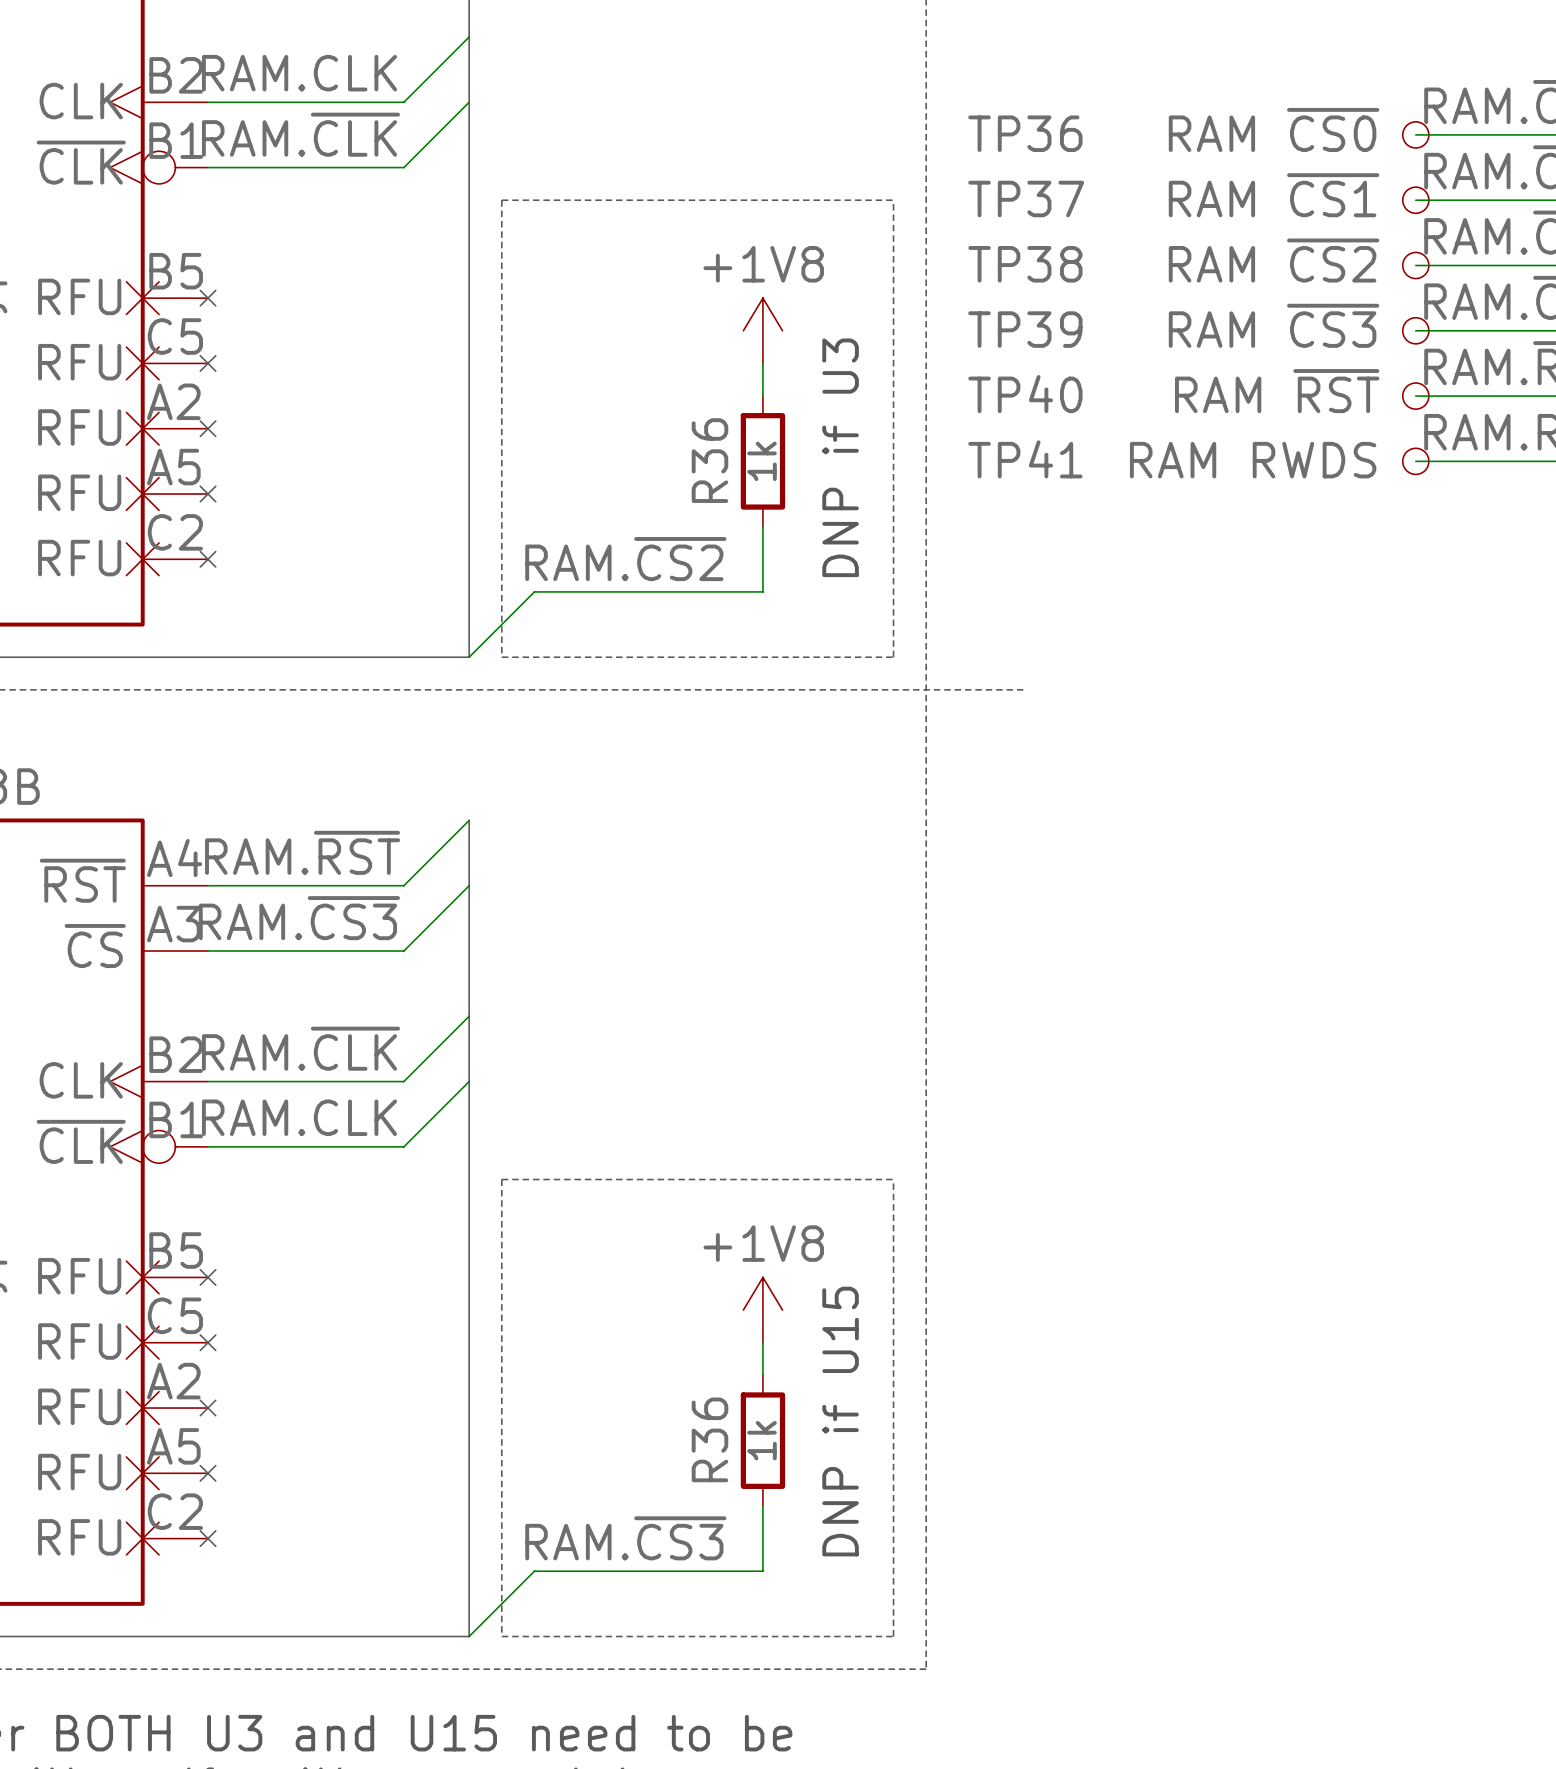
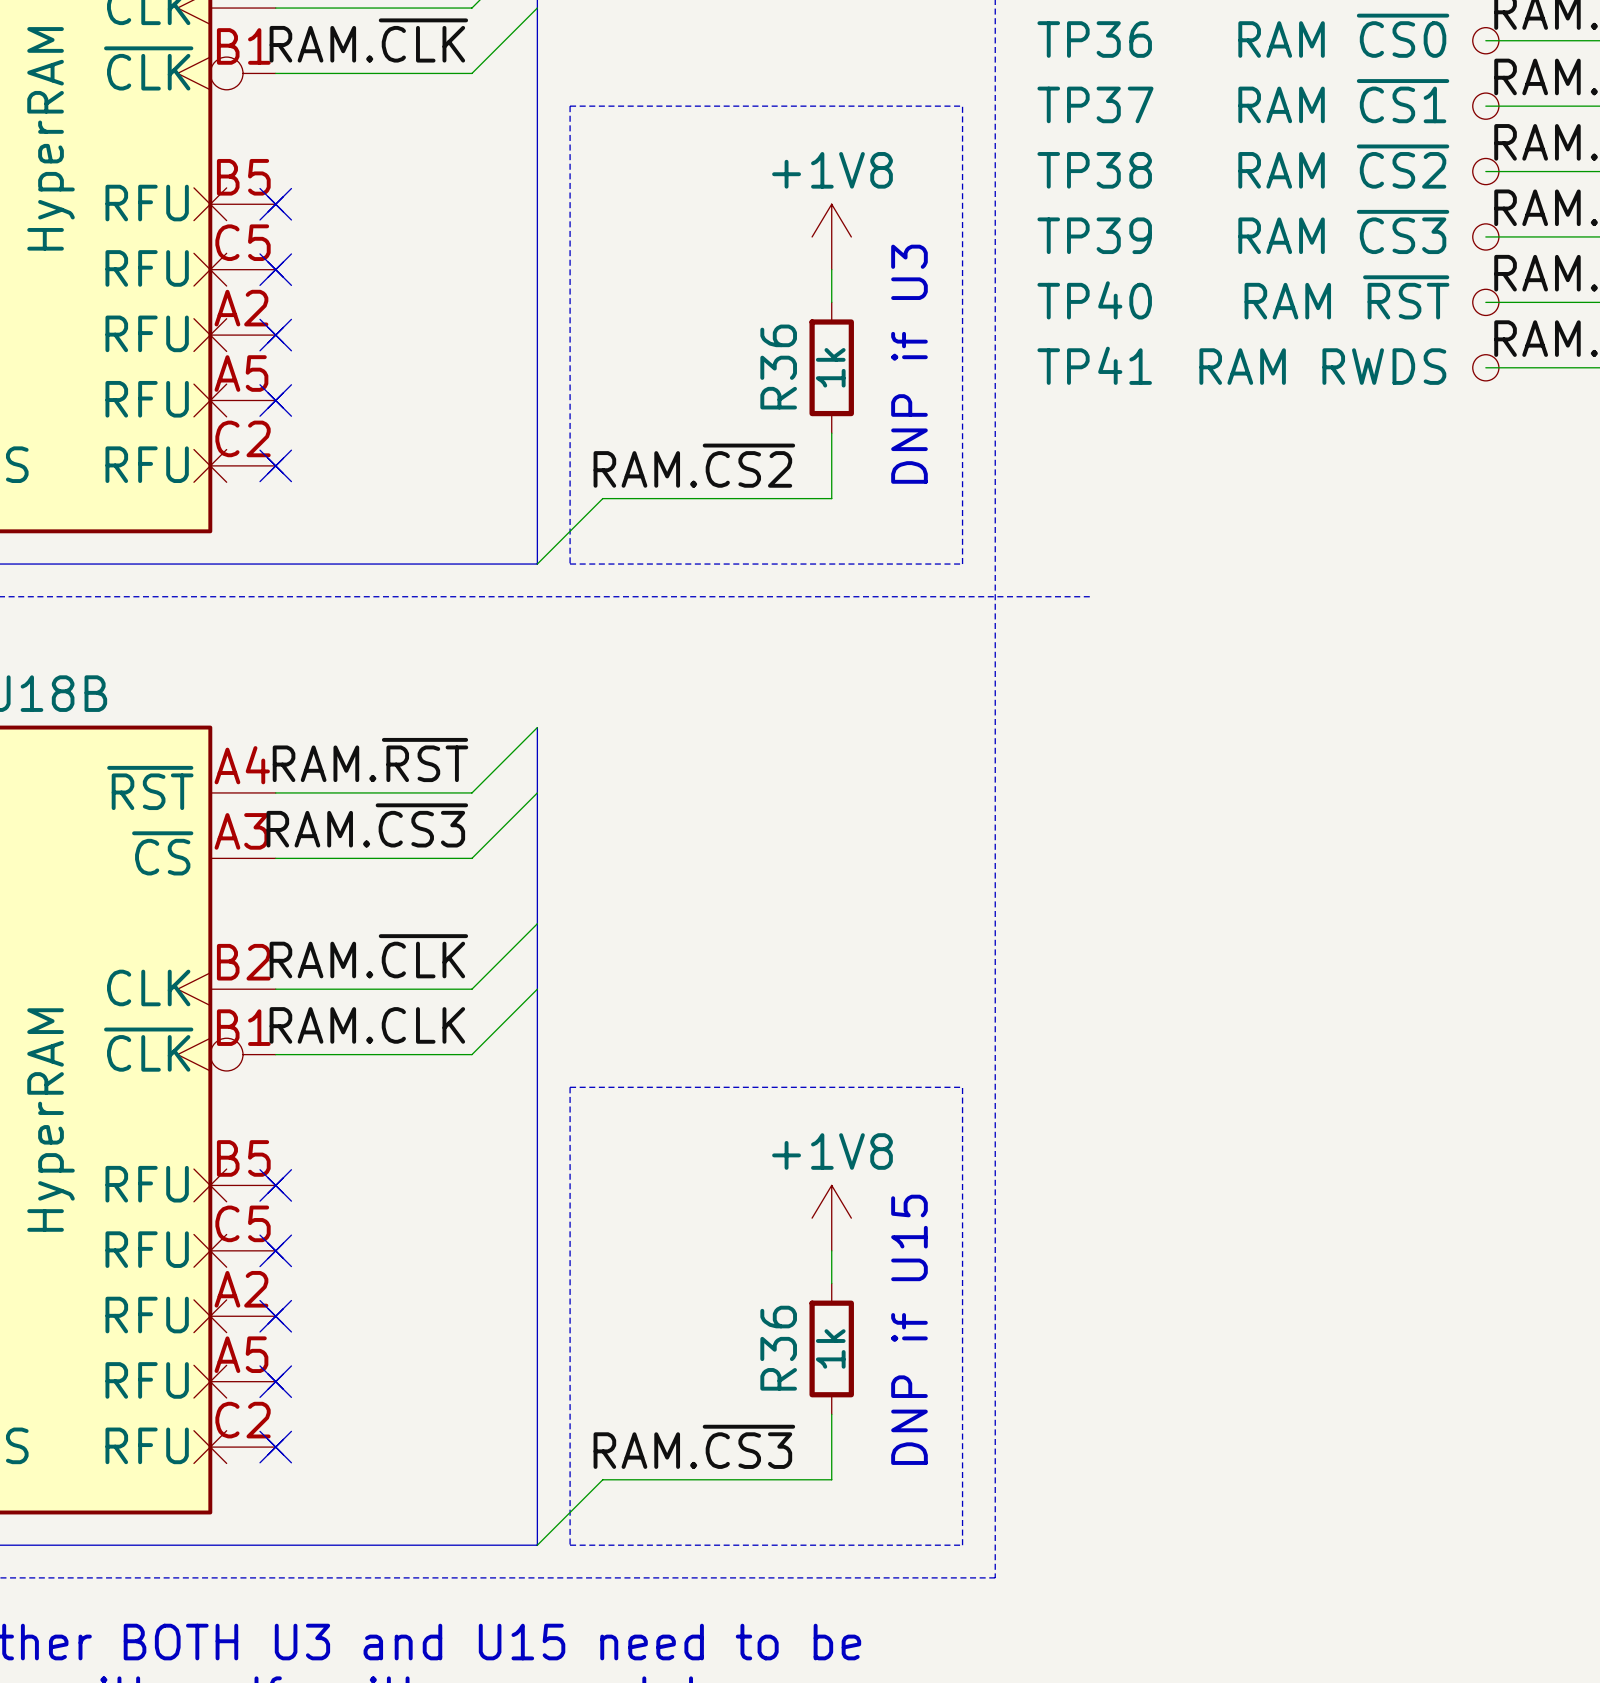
no-connect mark: none -> (275, 204)
no-connect mark: none -> (275, 269)
no-connect mark: none -> (275, 335)
no-connect mark: none -> (275, 400)
no-connect mark: none -> (275, 465)
no-connect mark: none -> (275, 1185)
no-connect mark: none -> (275, 1250)
no-connect mark: none -> (275, 1316)
no-connect mark: none -> (275, 1381)
no-connect mark: none -> (275, 1447)

